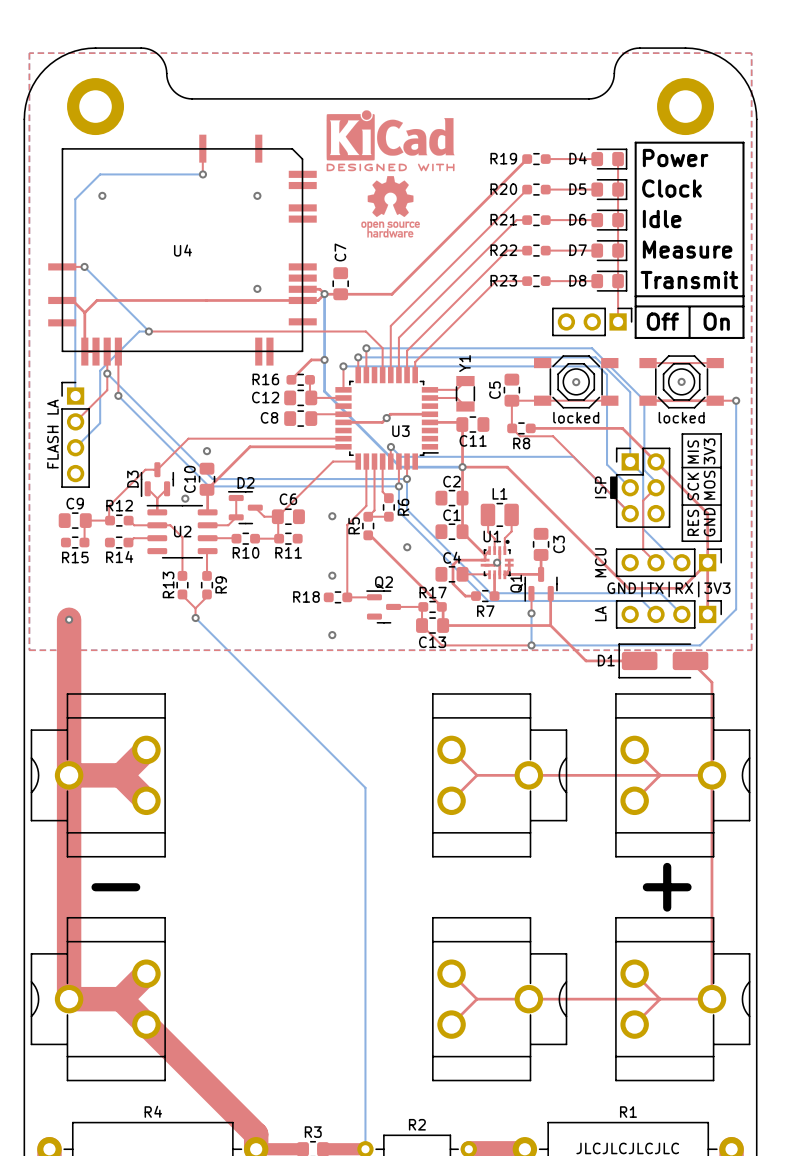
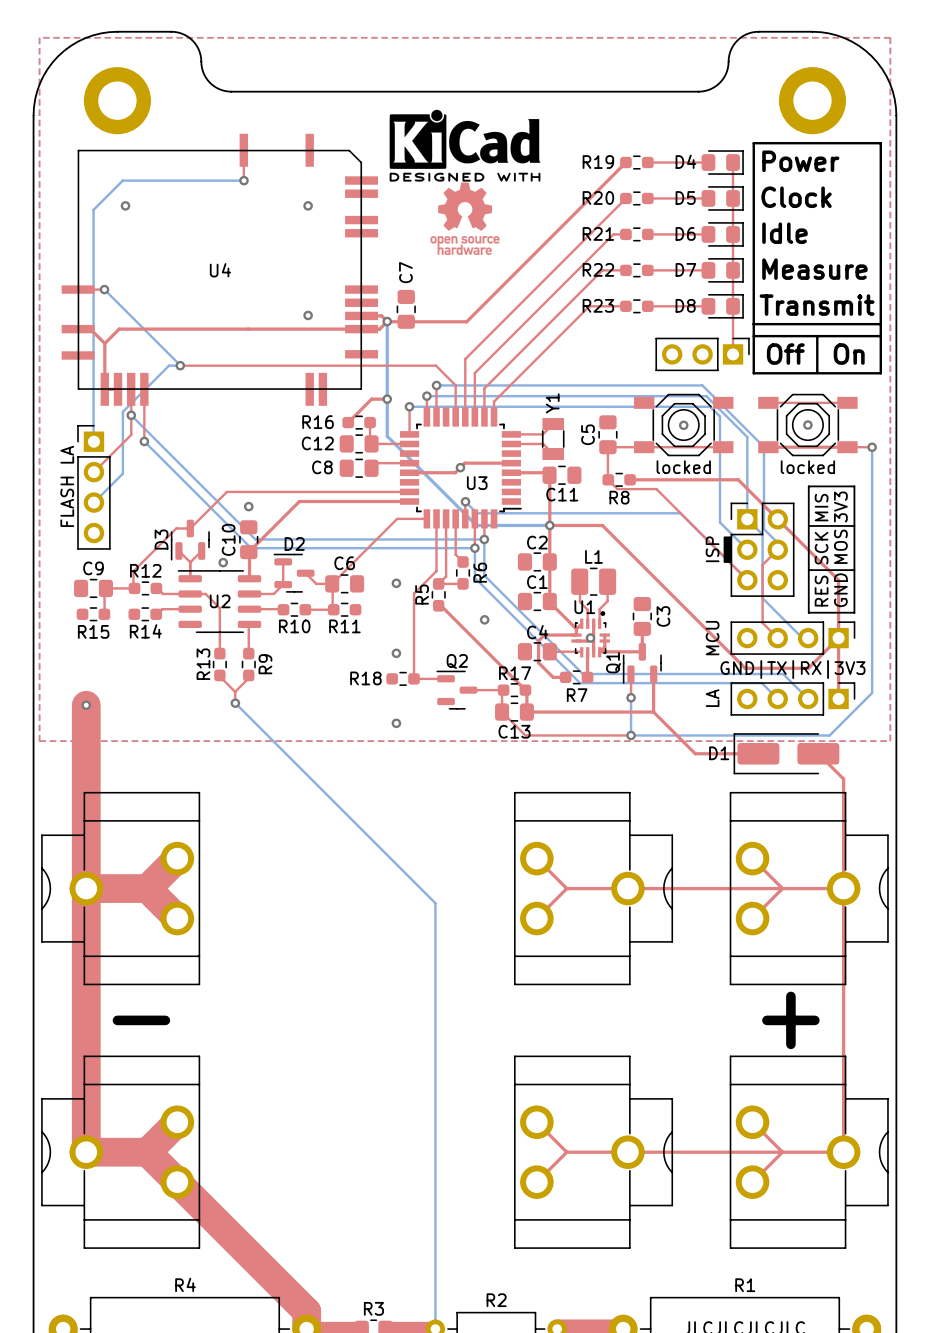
drawing shape: [326, 110, 455, 172] -> [389, 109, 541, 182]

